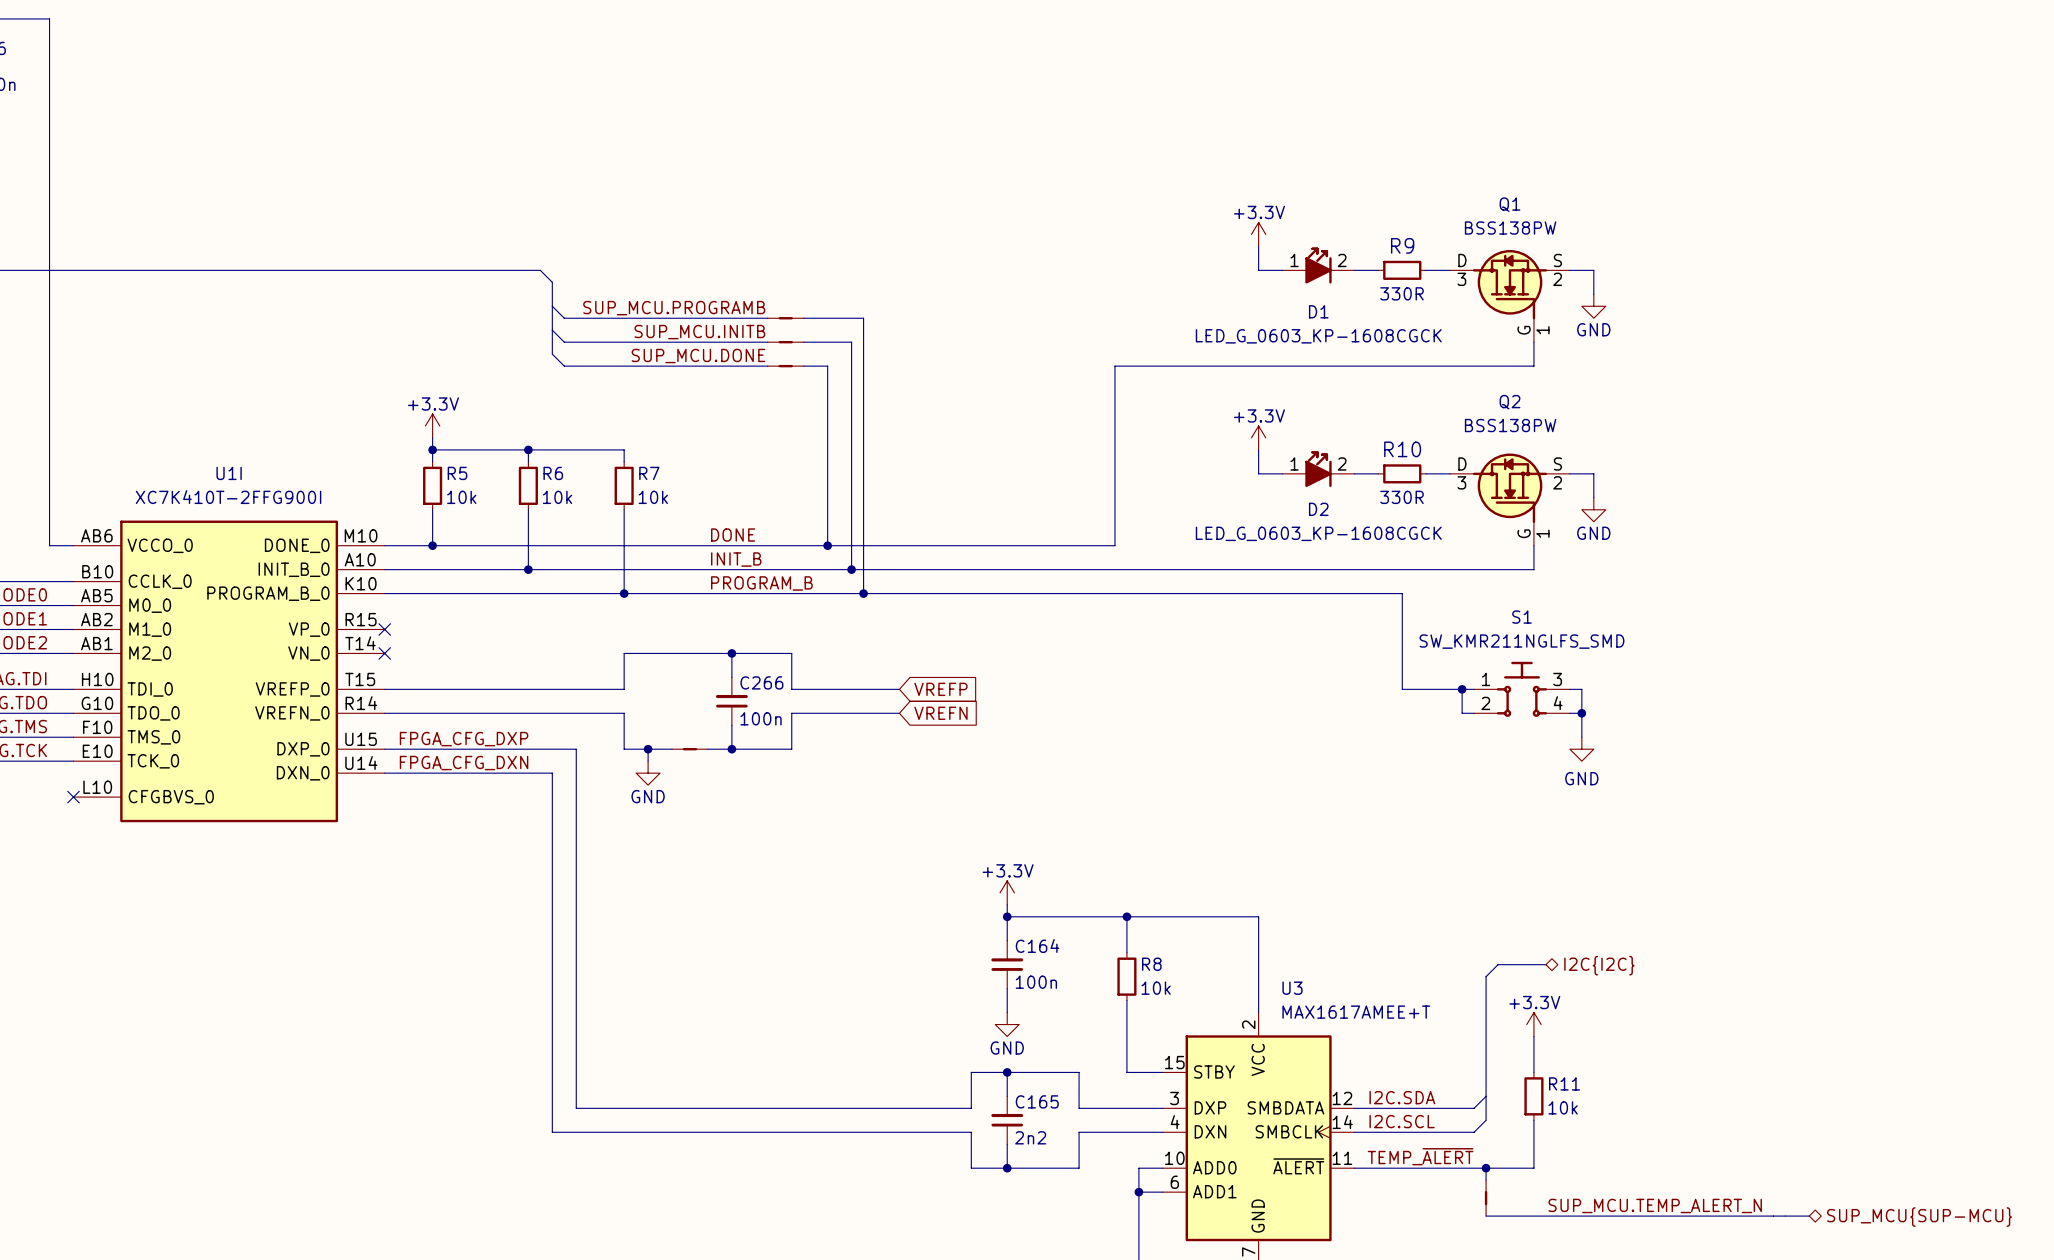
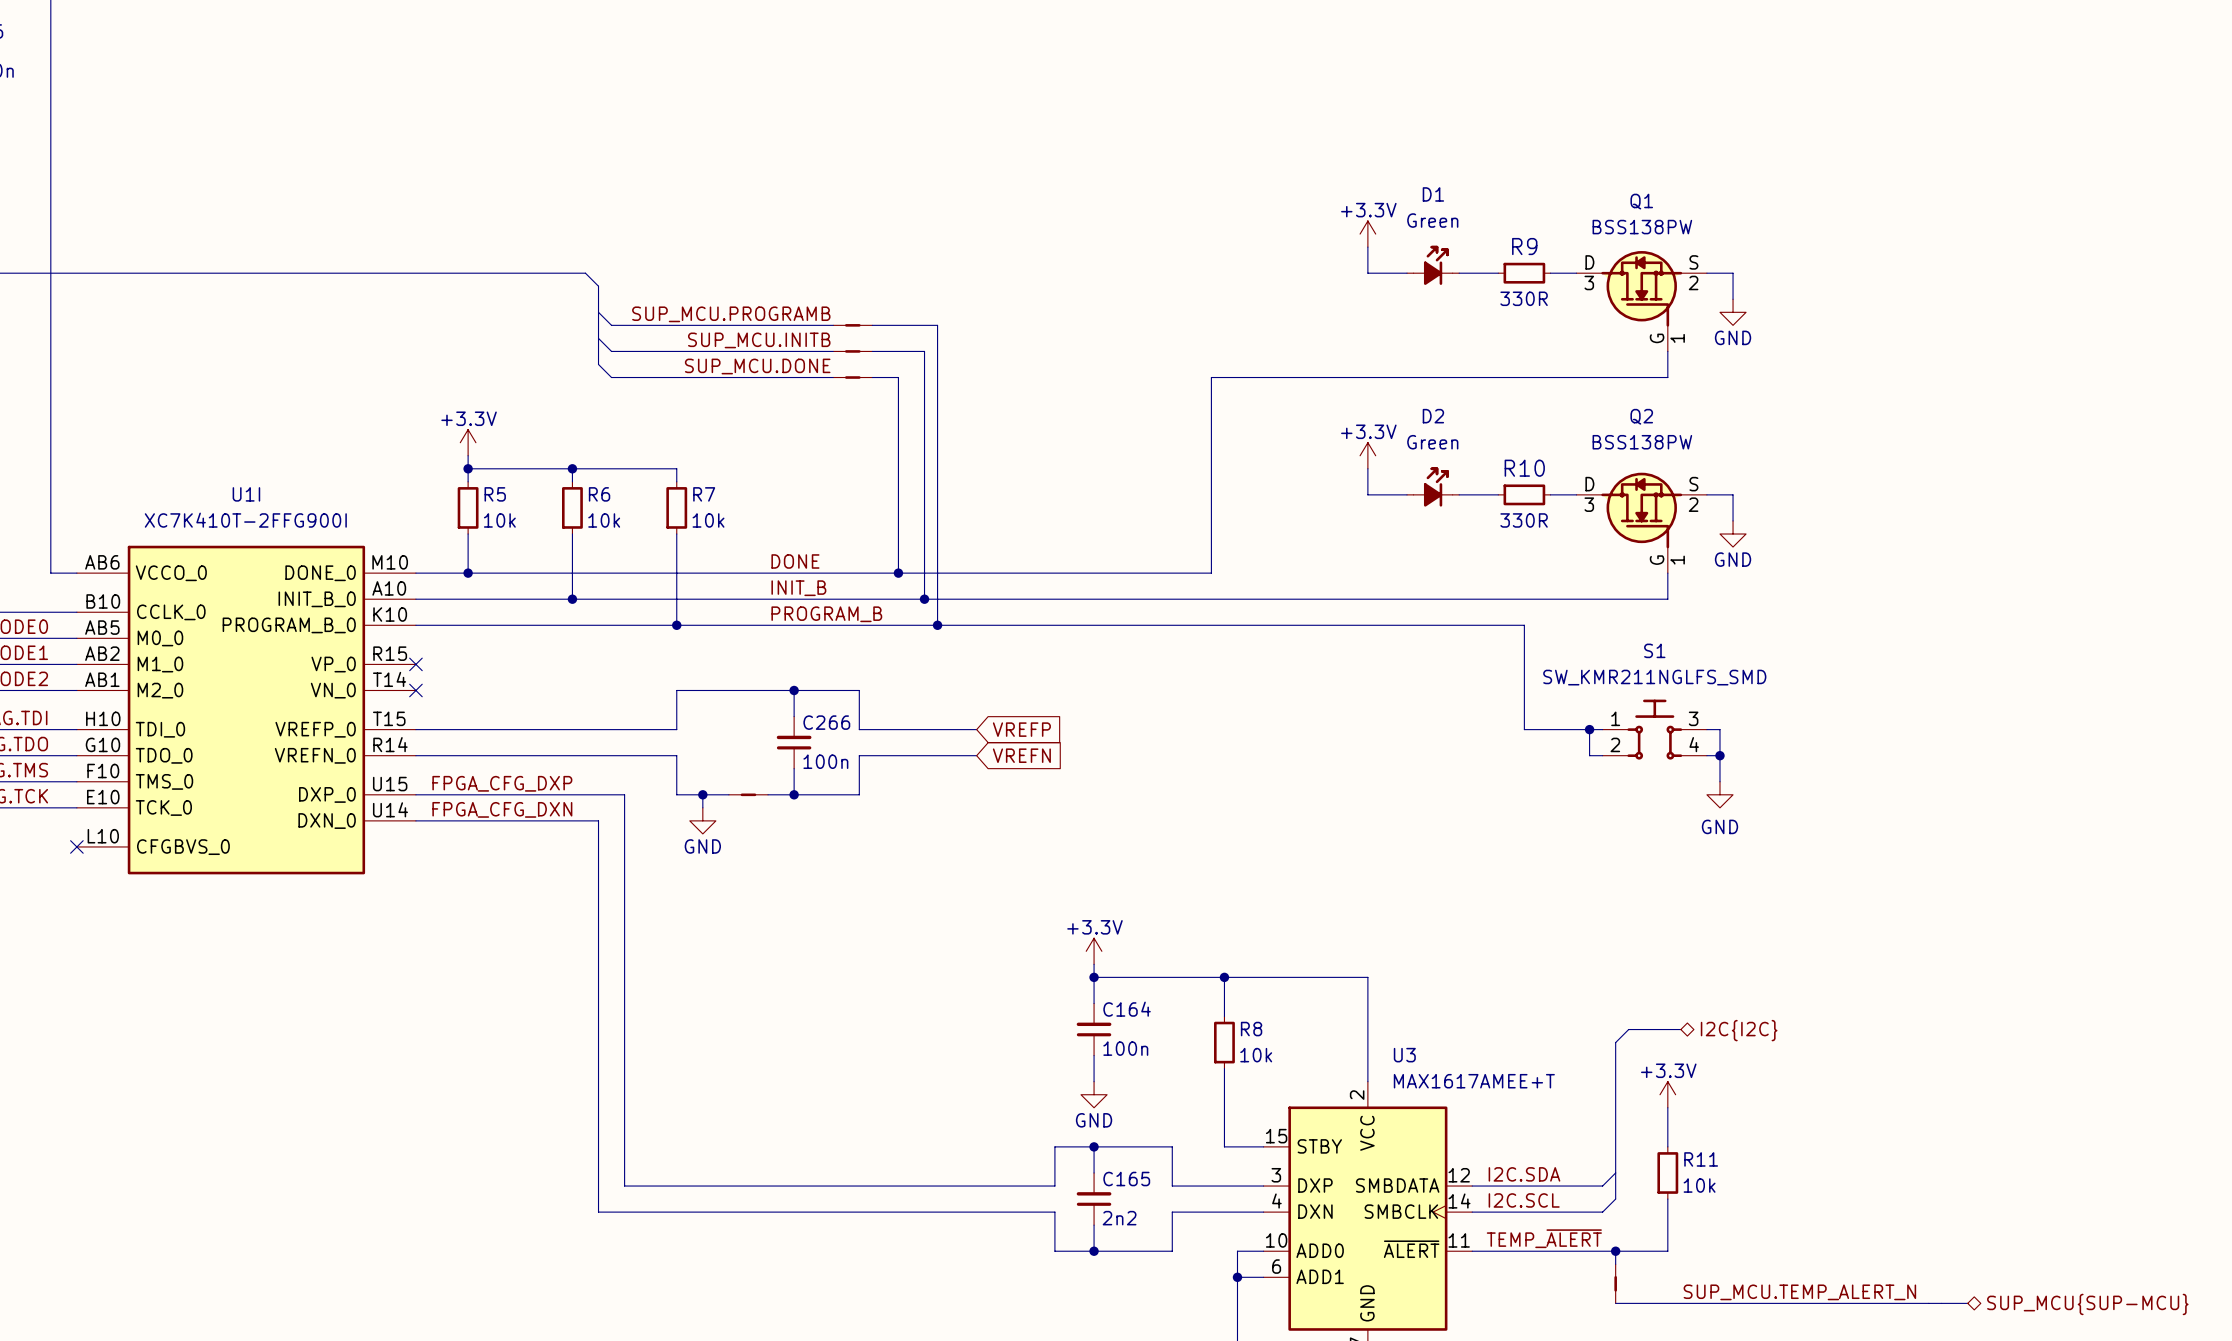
D1 text: none -> Green (1432, 220)
D1 symbol: [1282, 247, 1355, 284] -> [1407, 245, 1460, 285]
D1 name position: D1 (1318, 311) -> D1 (1433, 194)
D1 value: LED_G_0603_KP-1608CGCK (1318, 336) -> none
D2 text: none -> Green (1432, 442)
D2 symbol: [1282, 451, 1355, 488] -> [1407, 467, 1460, 507]
D2 name position: D2 (1318, 509) -> D2 (1433, 416)
D2 value: LED_G_0603_KP-1608CGCK (1318, 533) -> none

